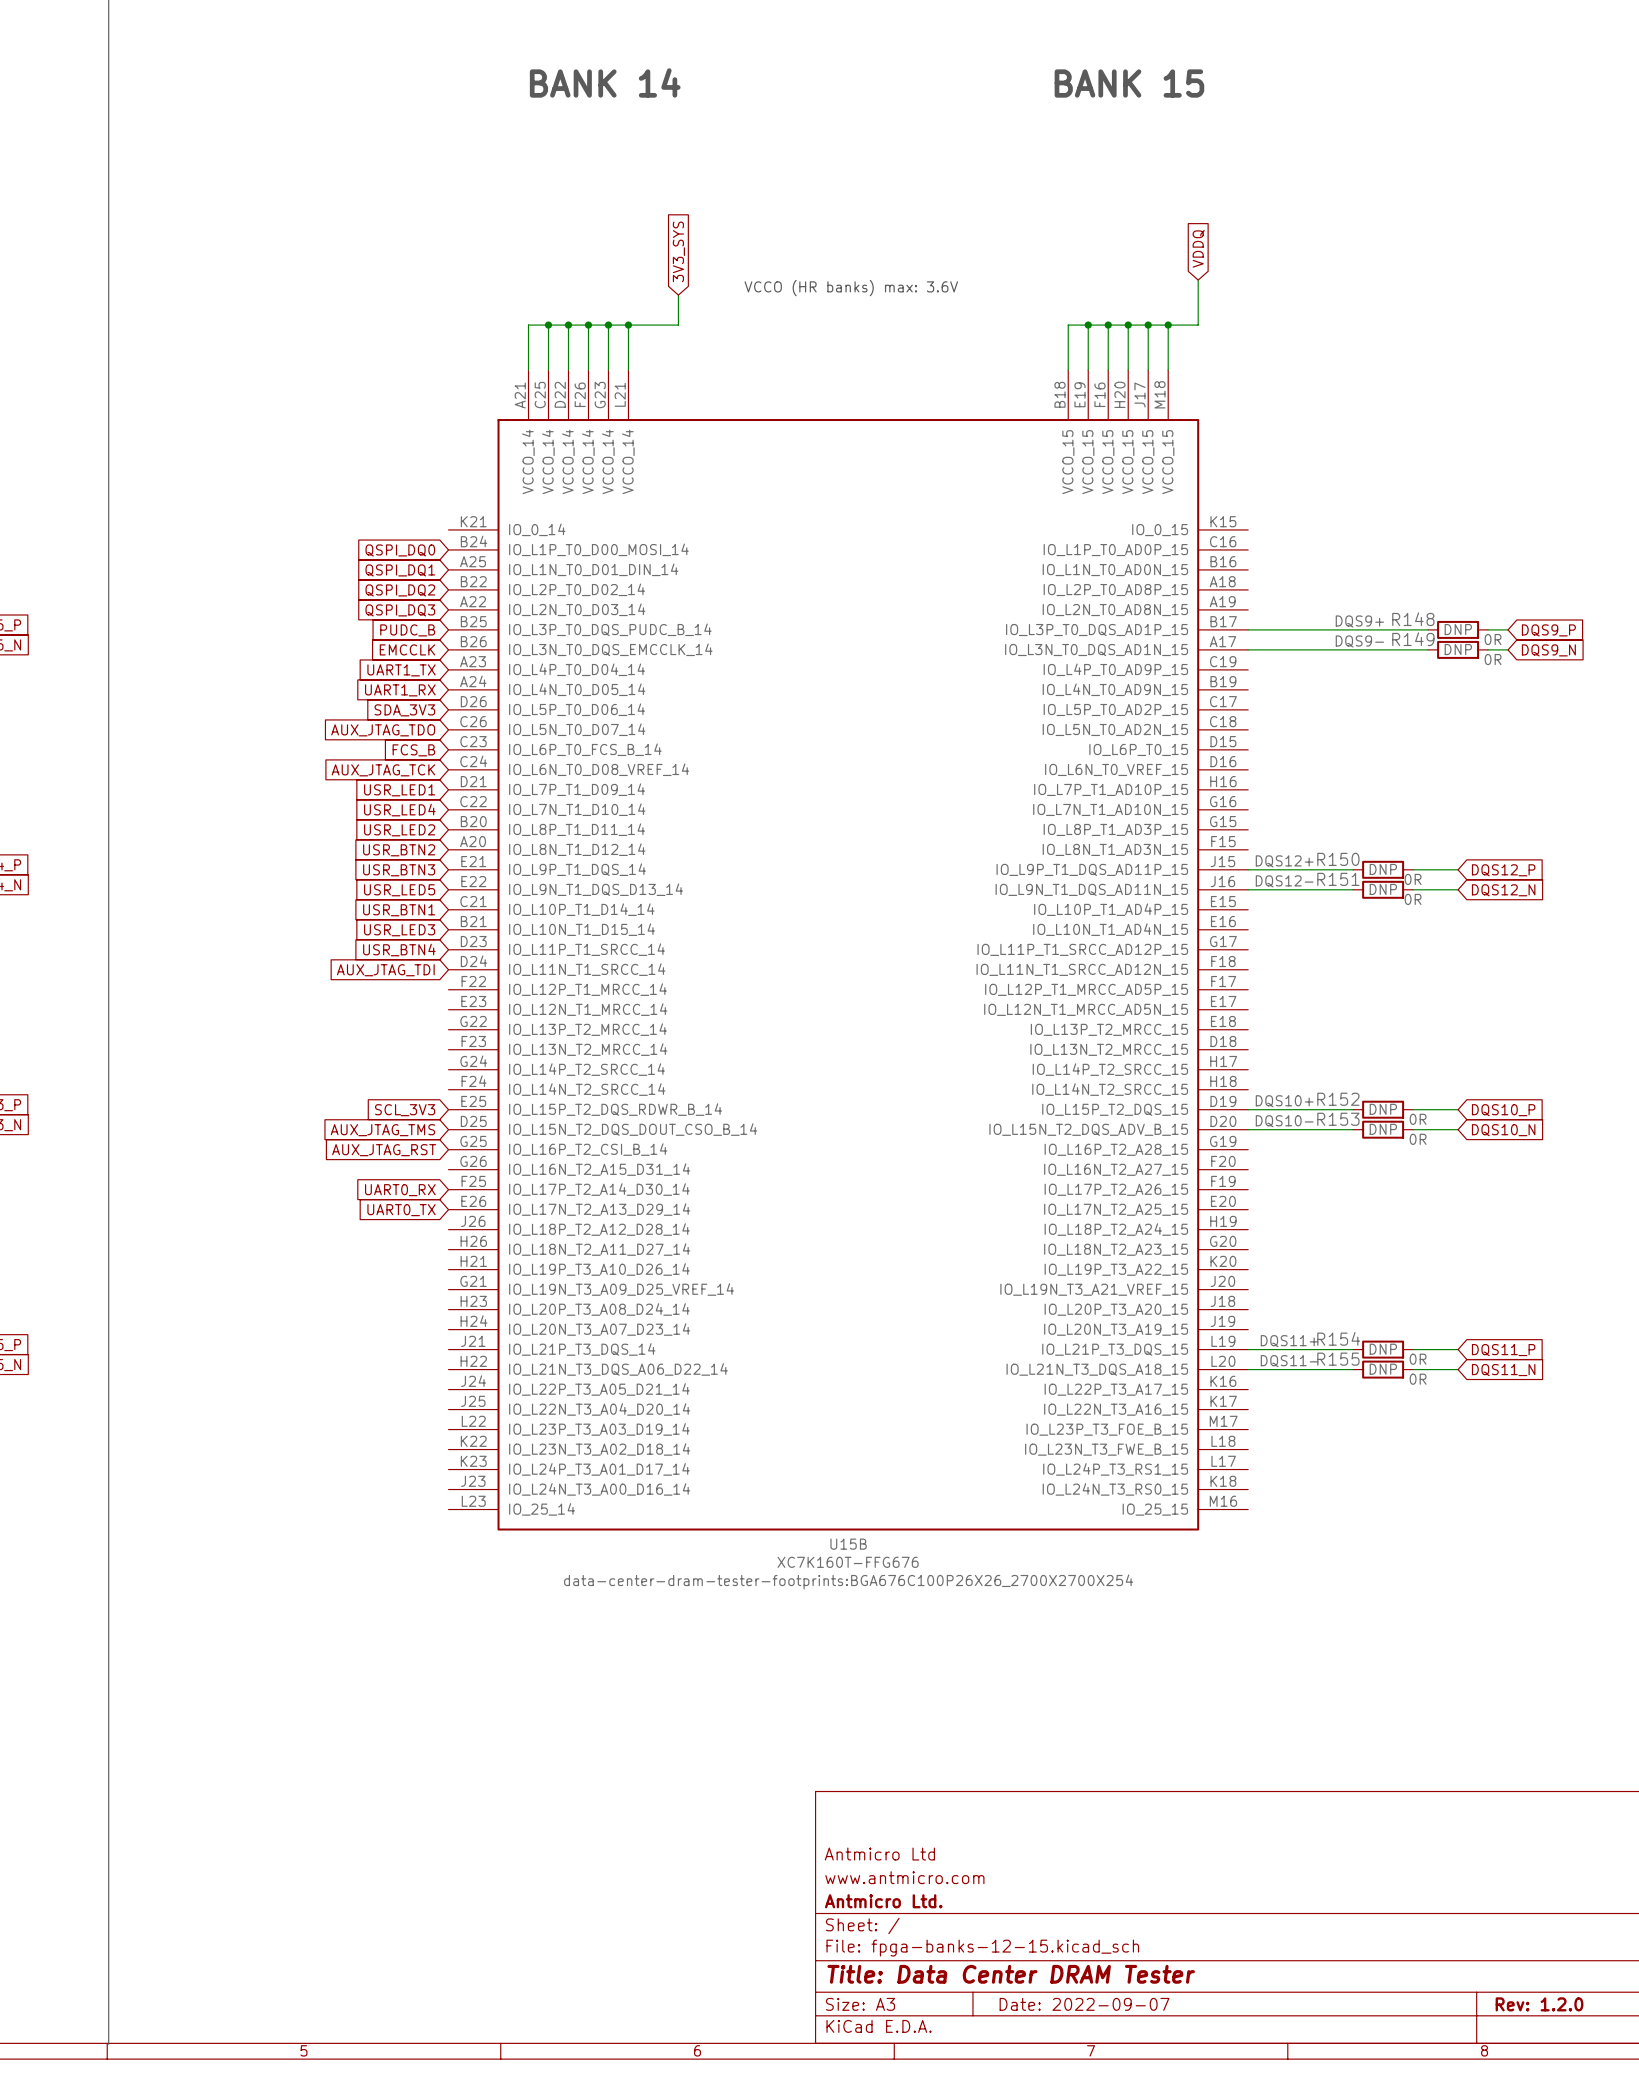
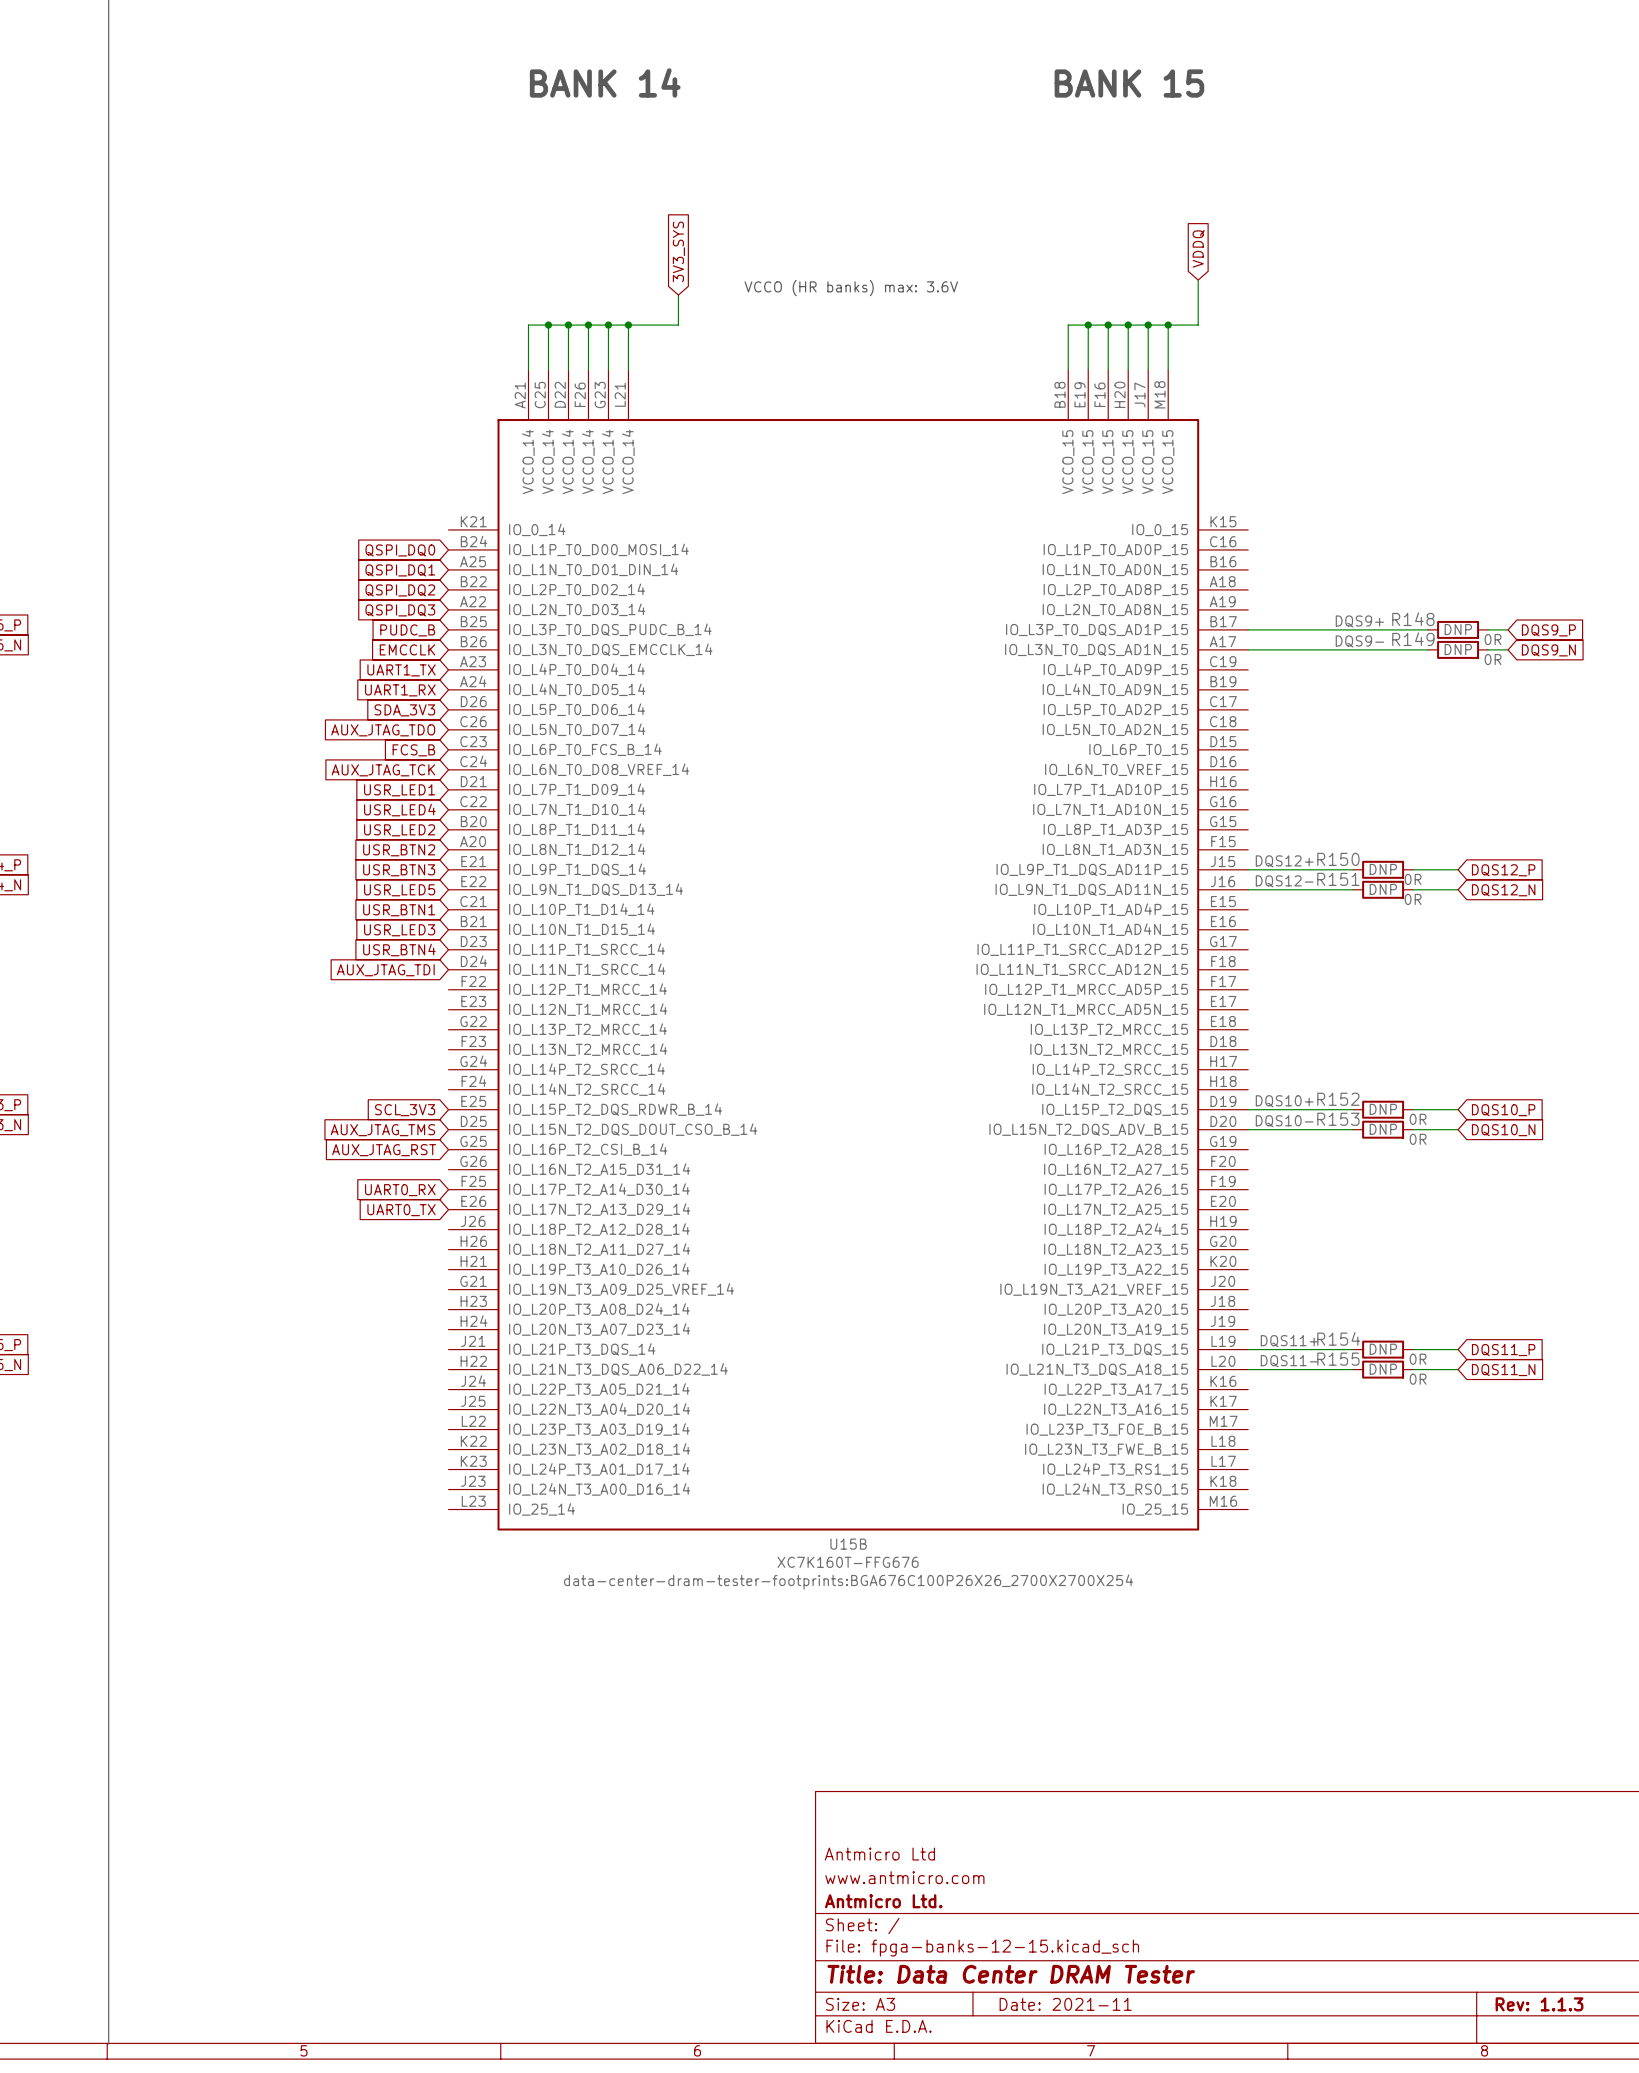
title block: Date: 2022-09-07 (1084, 2004) -> Date: 2021-11 (1065, 2004)
title block: Rev: 1.2.0 (1539, 2004) -> Rev: 1.1.3 (1539, 2004)

